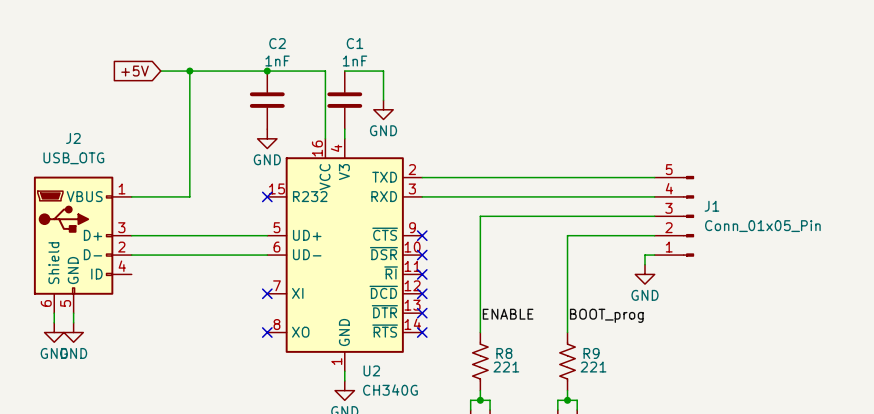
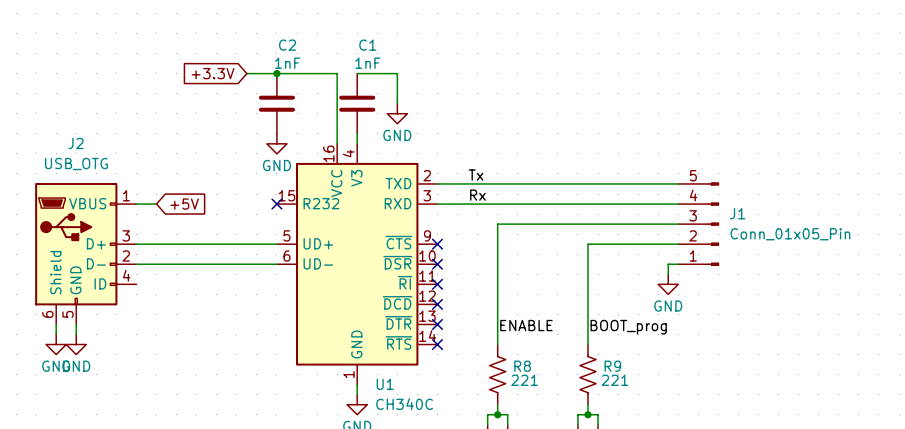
global label rotation: 0° (135, 71) -> 180° (184, 204)
global label position: +5V (135, 71) -> +5V (184, 204)
wire: (160, 71) (238, 71) -> none
wire: (189, 71) (189, 196) (151, 196) -> none
junction: (189, 71) -> none
global label: none -> +3.3V (213, 73)
label: none -> Tx (476, 175)
label: none -> Rx (477, 195)
U2: CH340G (344, 255) -> none
U1: none -> CH340C (357, 264)
no-connect mark: (267, 293) -> none
no-connect mark: (267, 332) -> none

